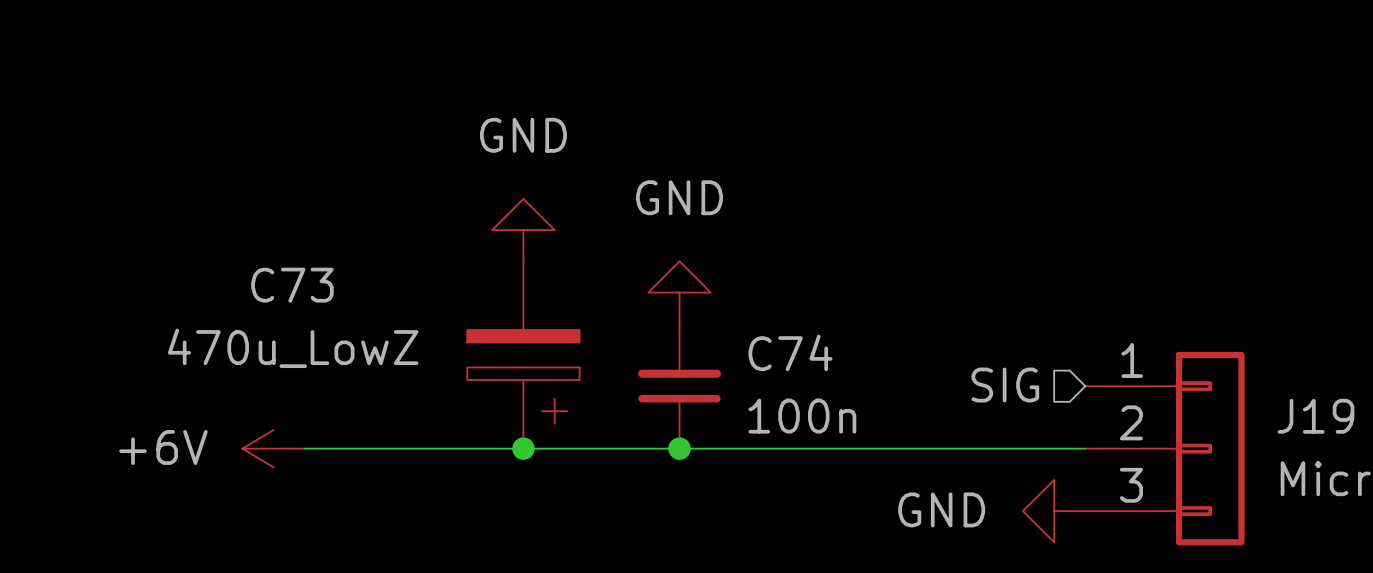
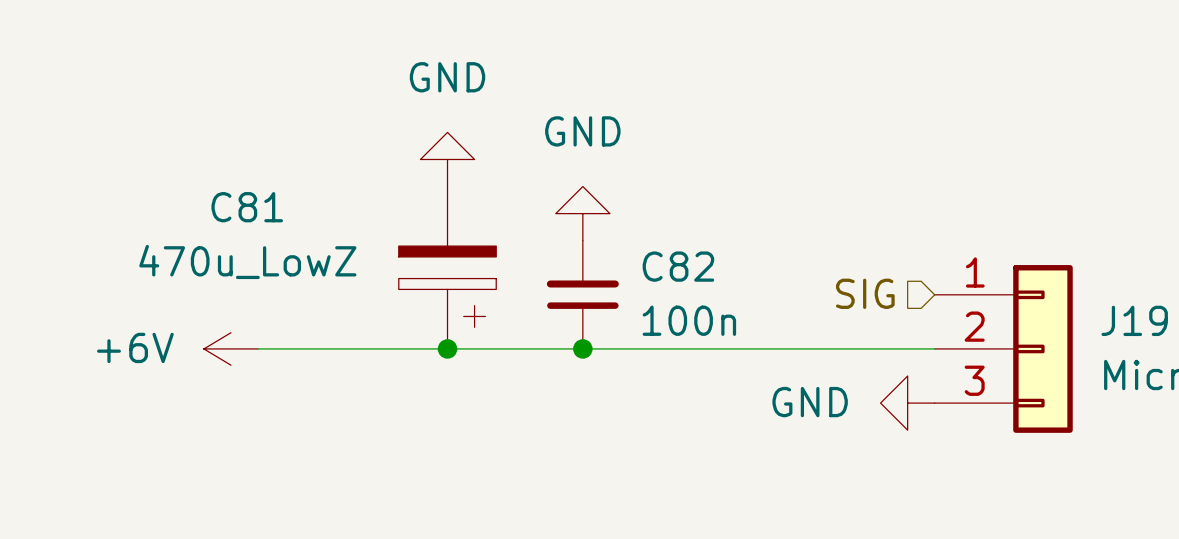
C73 name: C73 (292, 285) -> C81 (247, 207)
C74 name: C74 (790, 352) -> C82 (678, 266)

